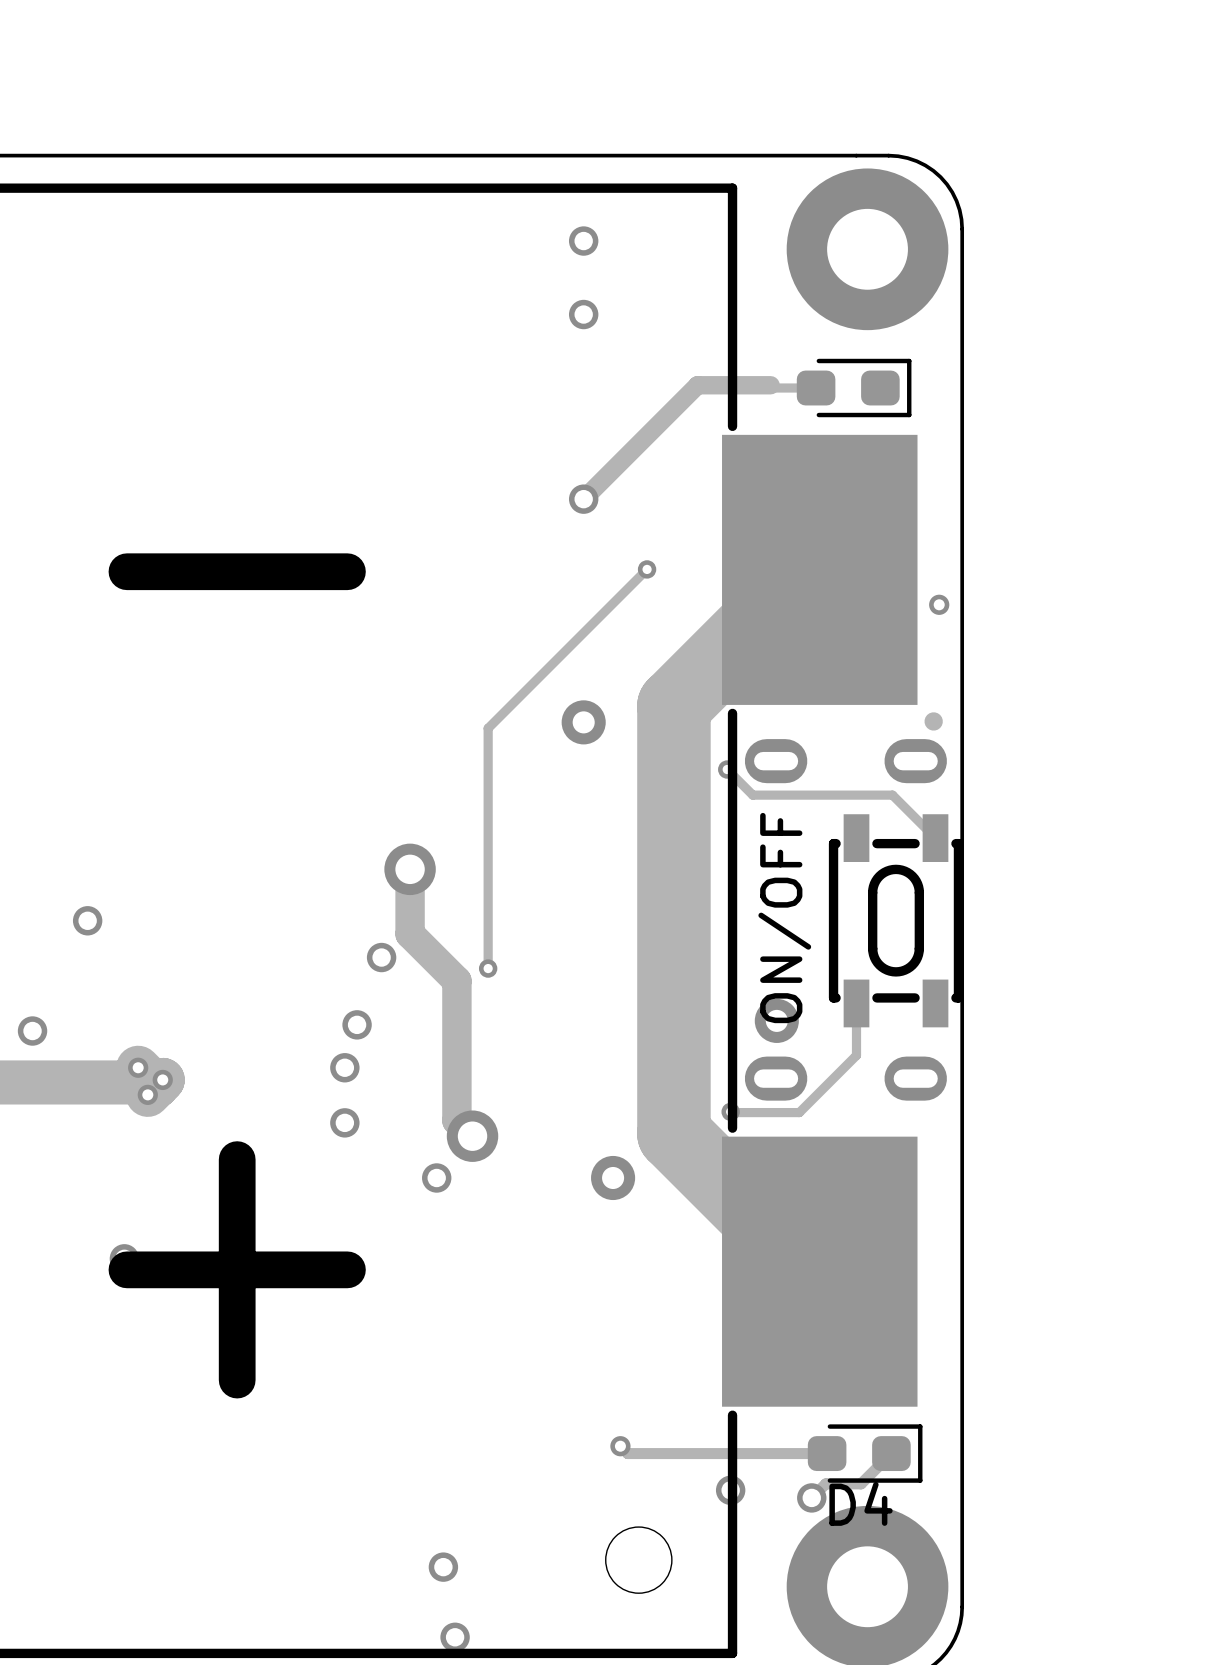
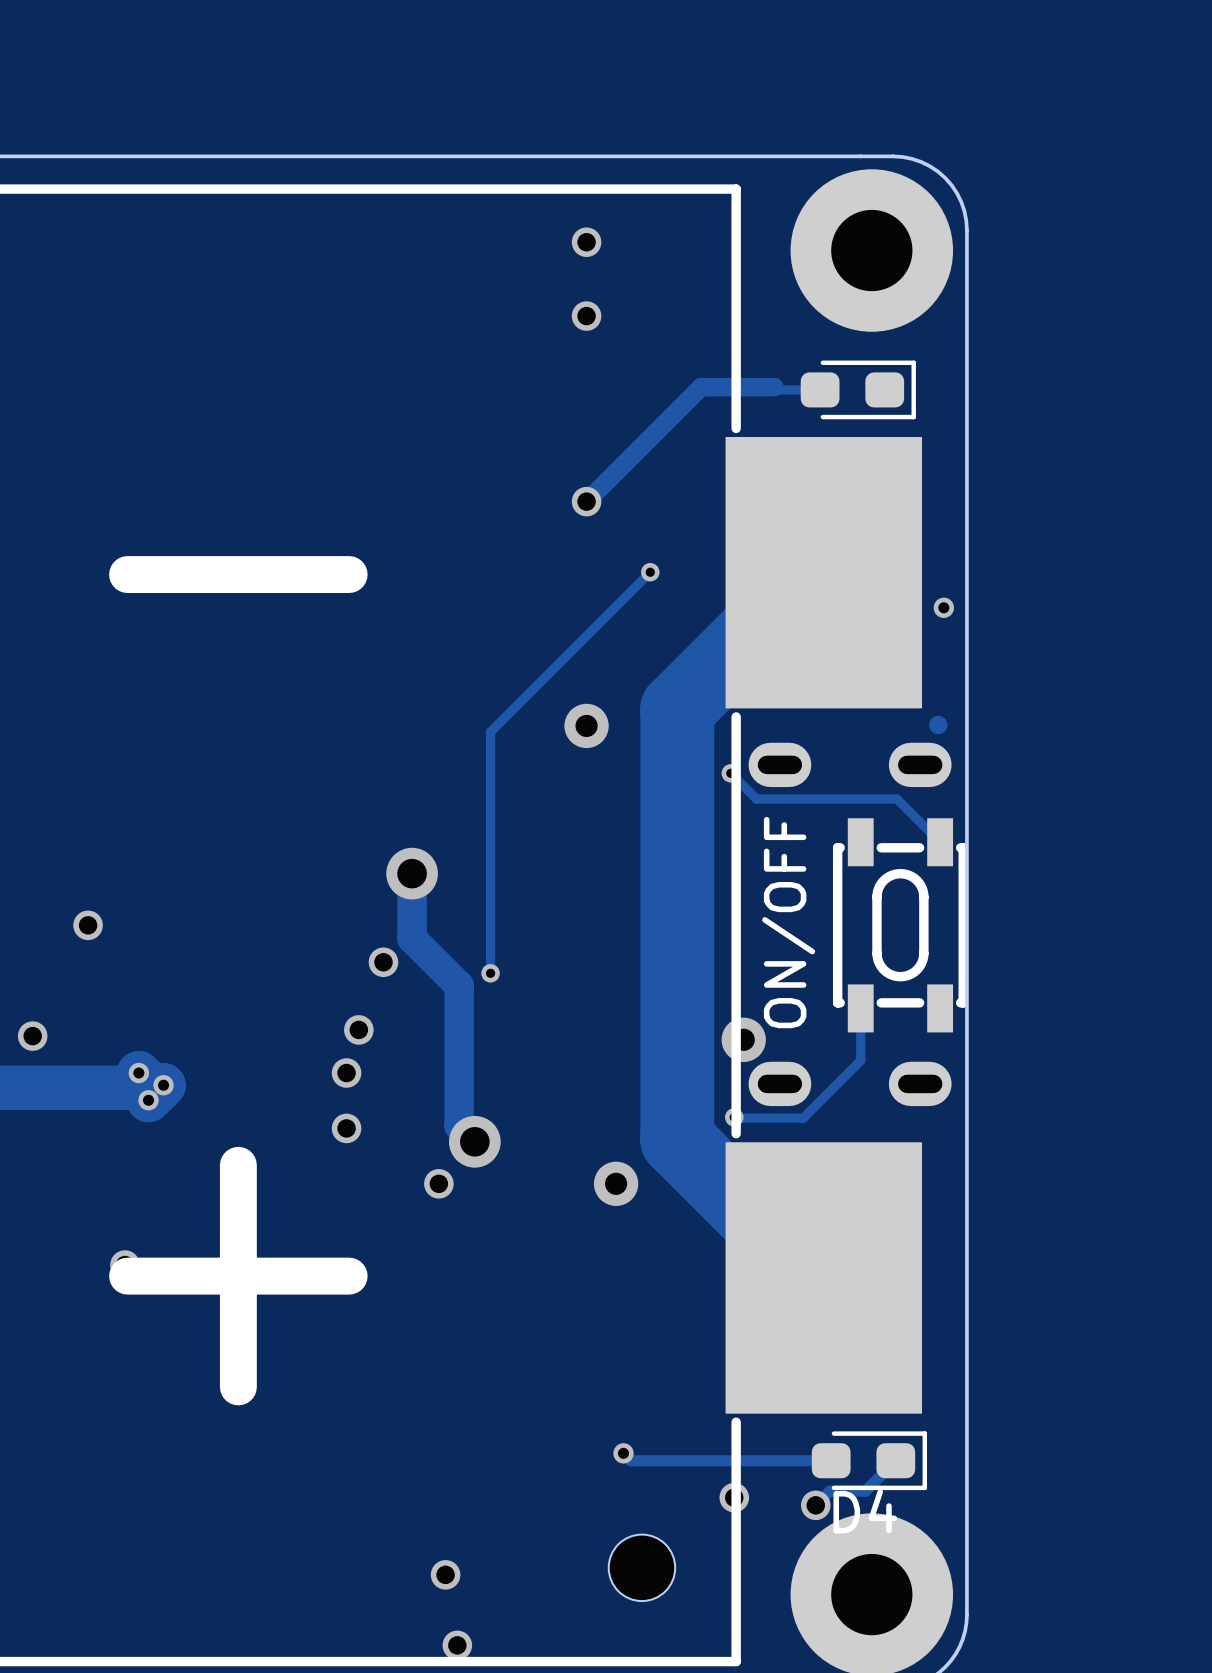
via position: (776, 1020) -> (743, 1039)

